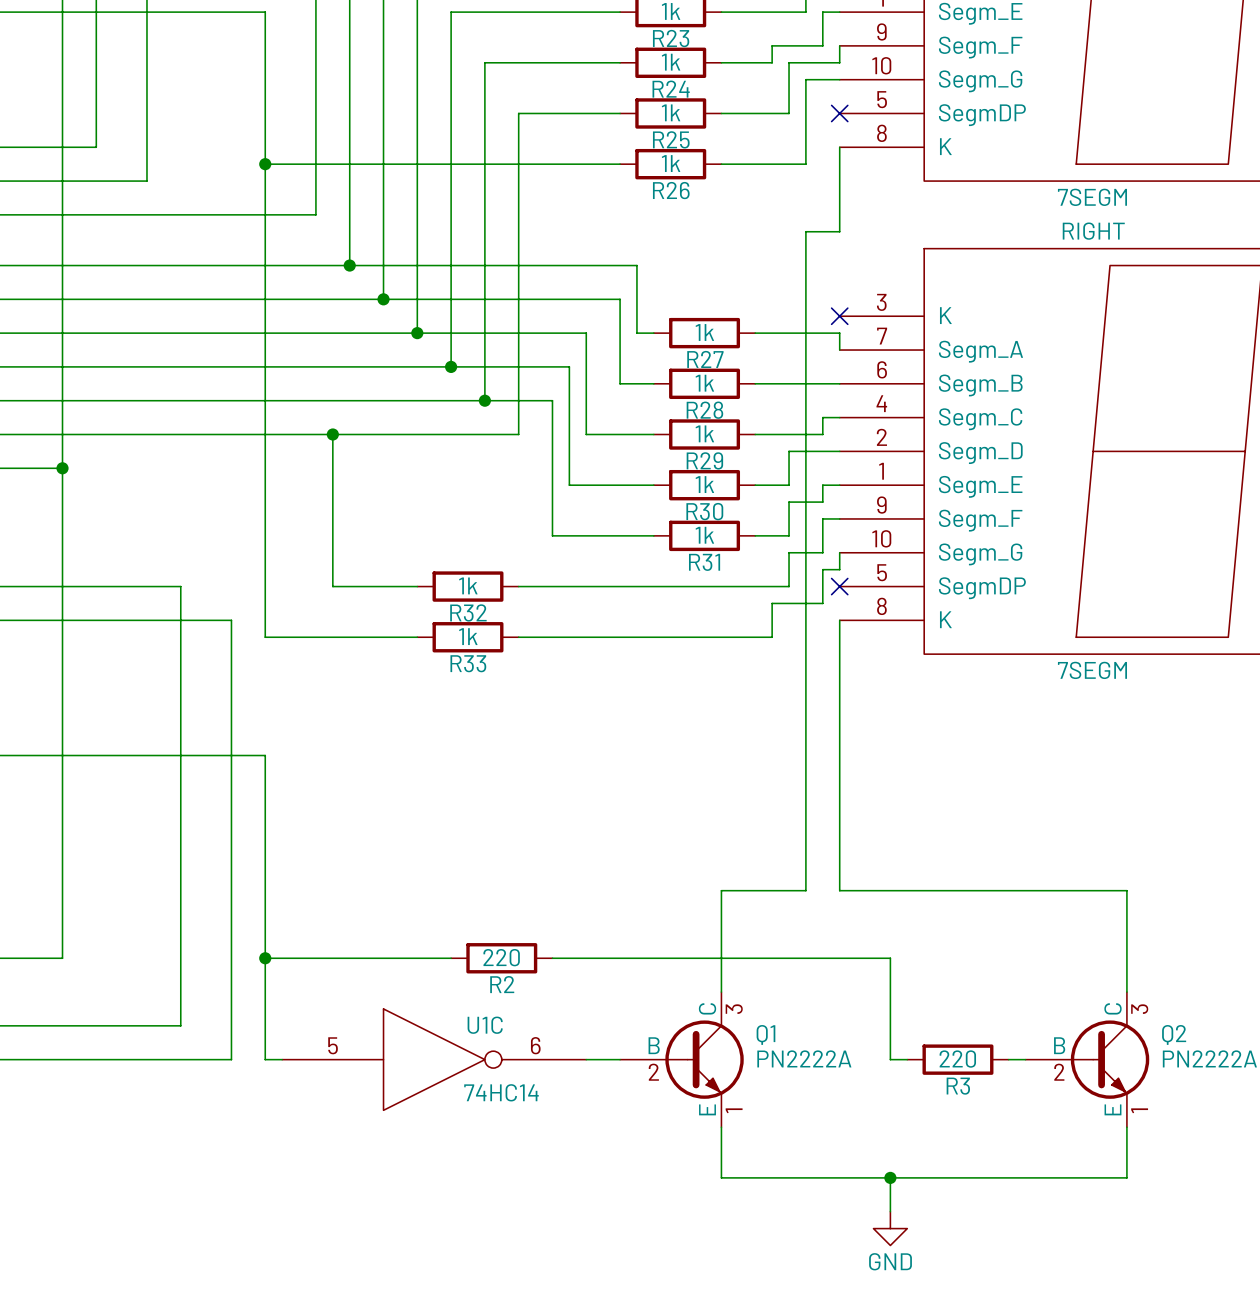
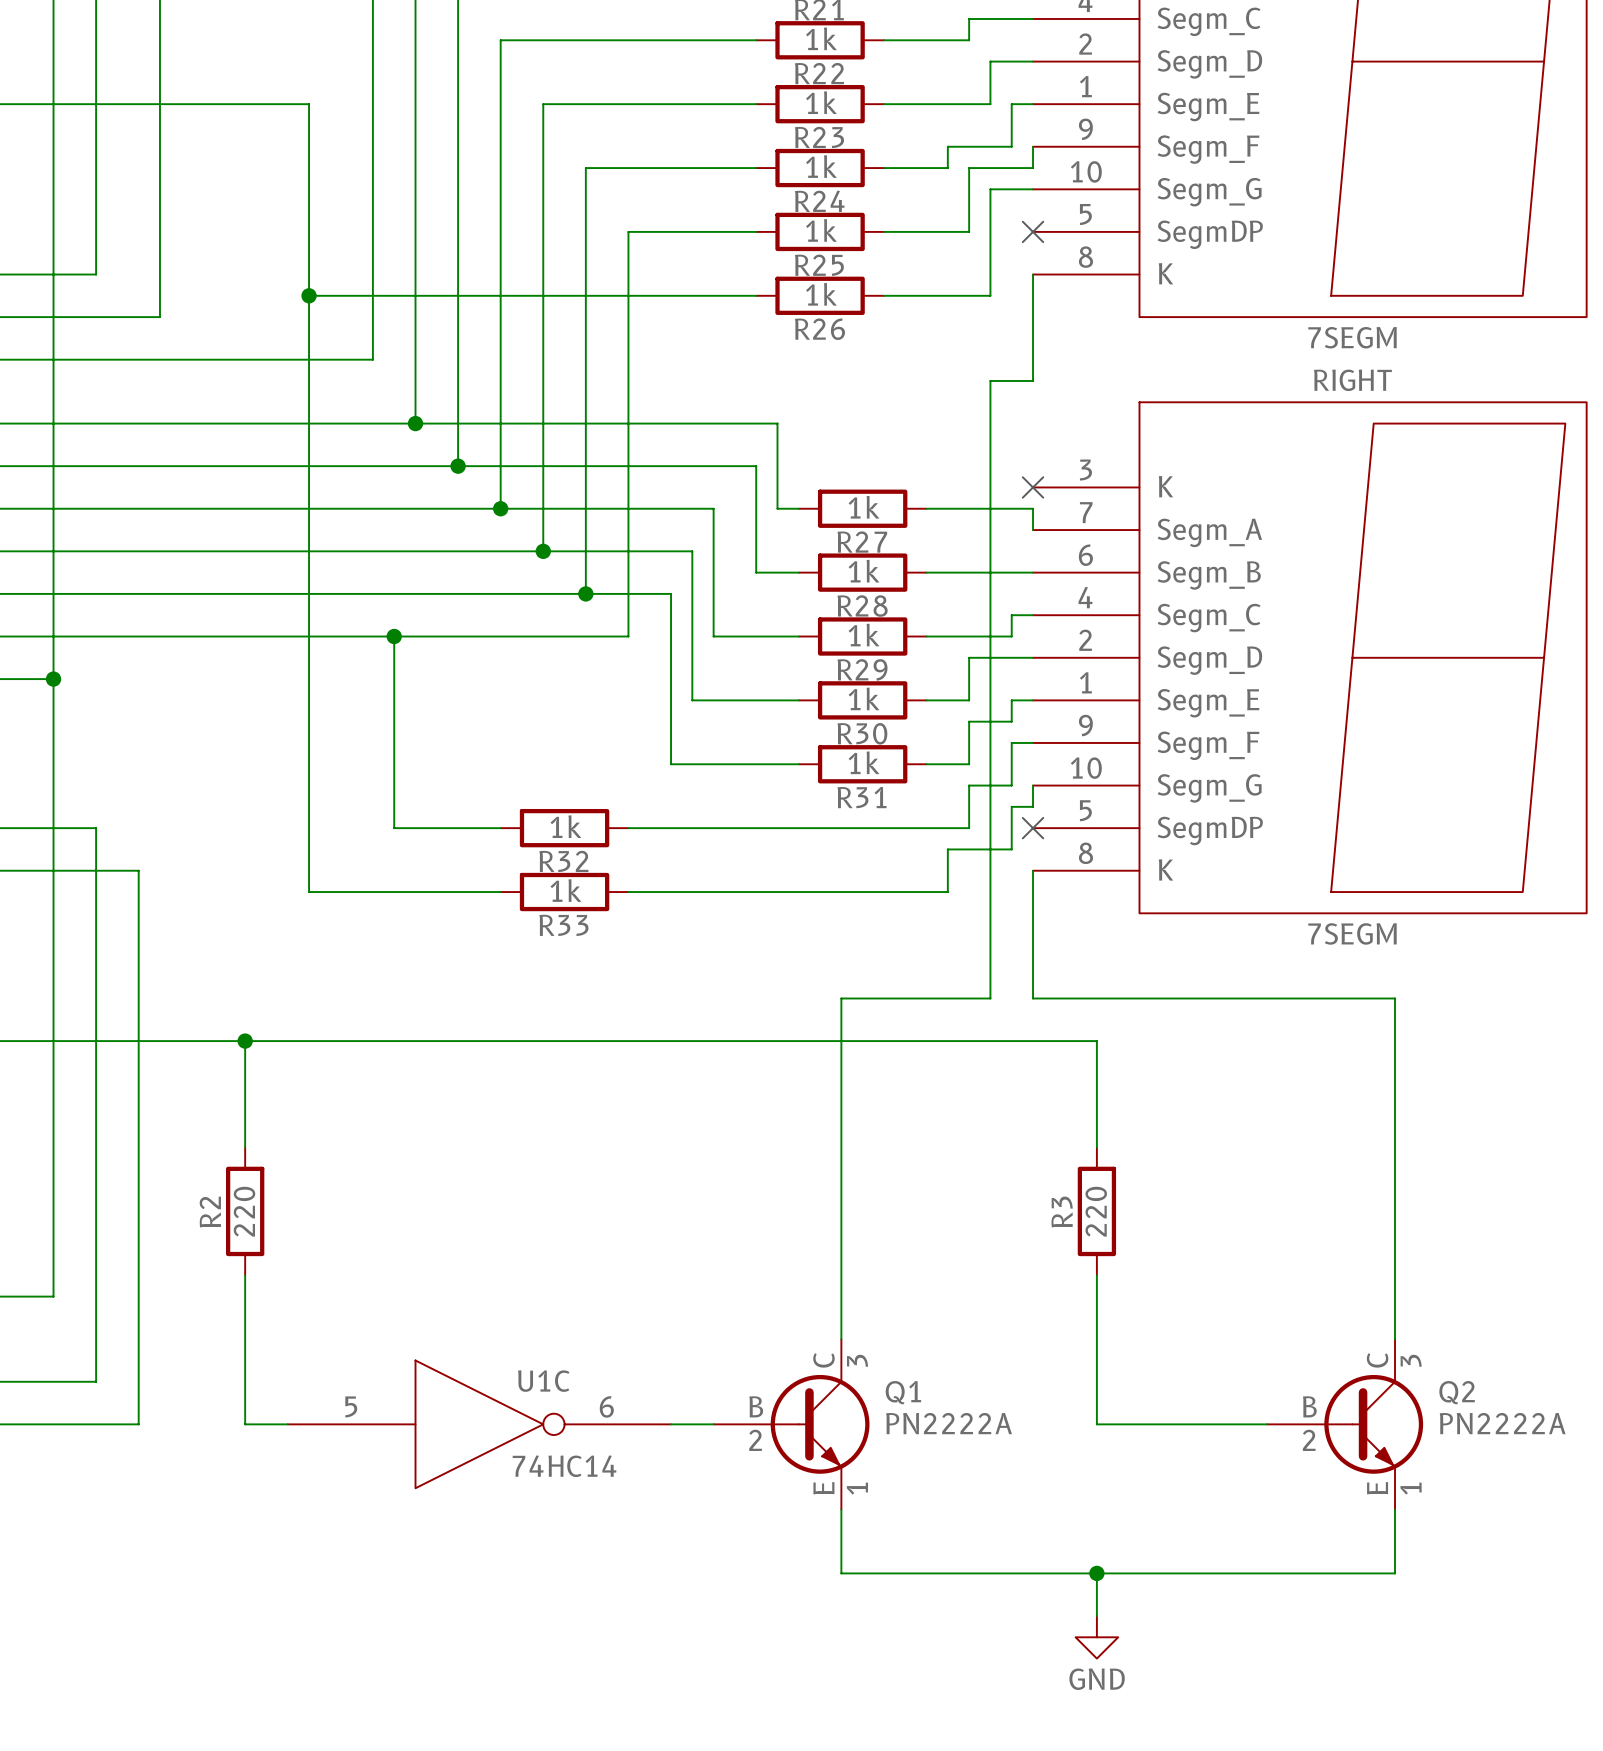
wire: (96, 586) (180, 586) (180, 1025) (96, 1025) -> (96, 828) (96, 1381)
wire: (130, 620) (231, 620) (231, 1059) -> (138, 870) (138, 1424)
wire: (805, 721) (805, 890) (721, 890) (721, 992) -> (990, 998) (841, 998) (841, 1339)
wire: (839, 721) (839, 890) (1126, 890) -> (1033, 998) (1395, 998) (1395, 1211)
wire: none -> (245, 1041) (245, 1147)
junction: none -> (245, 1041)
wire: (265, 755) (265, 1059) (282, 1059) -> (309, 1041) (1096, 1041) (1096, 1147)
wire: (265, 958) (451, 958) -> none
junction: (265, 958) -> none
R2 rotation: 0° (501, 958) -> 90° clockwise (245, 1211)
R2 position: (501, 958) -> (245, 1211)
wire: (552, 958) (890, 958) -> (1096, 1275) (1096, 1296)
wire: (130, 1059) (214, 1059) -> (245, 1275) (245, 1424)
wire: none -> (266, 1424) (287, 1424)
U1C position: (434, 1059) -> (479, 1424)
Q1 position: (681, 1059) -> (791, 1424)
wire: none -> (1118, 1424) (1245, 1424)
R3 rotation: 0° (957, 1059) -> 90° clockwise (1096, 1211)
R3 position: (957, 1059) -> (1096, 1211)
wire: (721, 1127) (721, 1177) -> (841, 1509) (841, 1573) (883, 1573)

